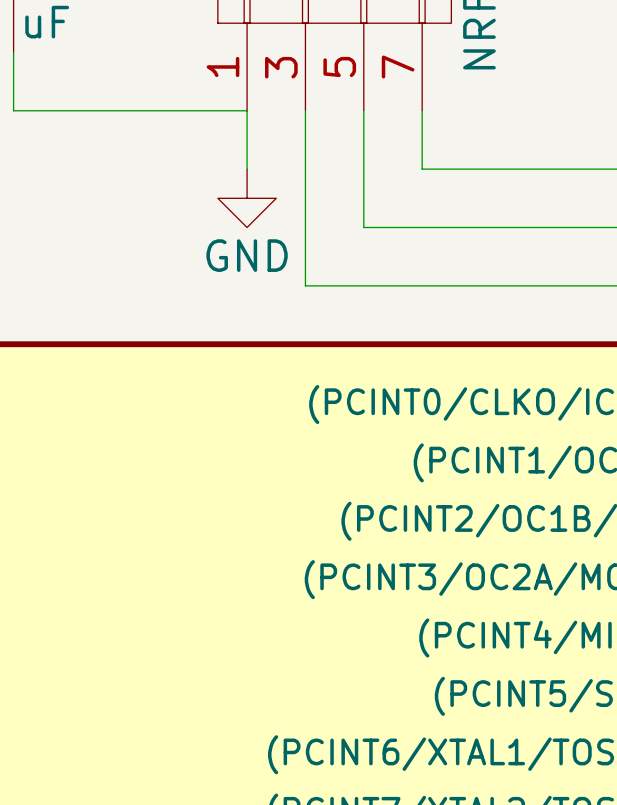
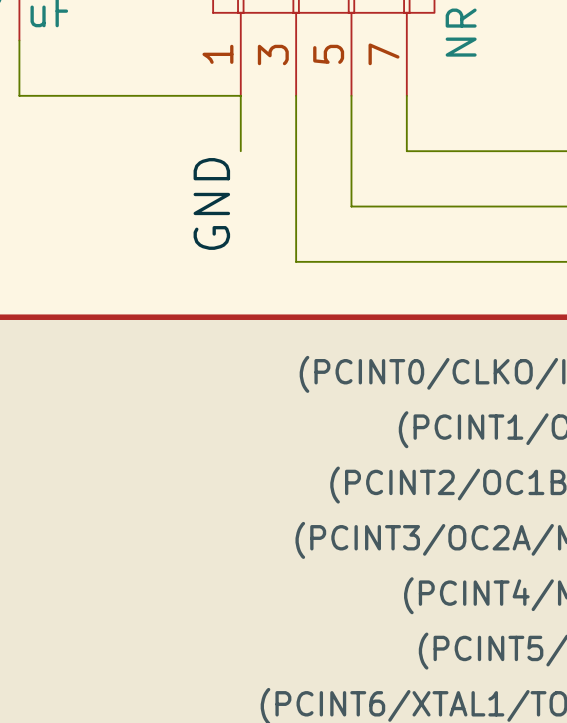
power symbol: GND (247, 198) -> none
label: none -> GND (211, 203)

